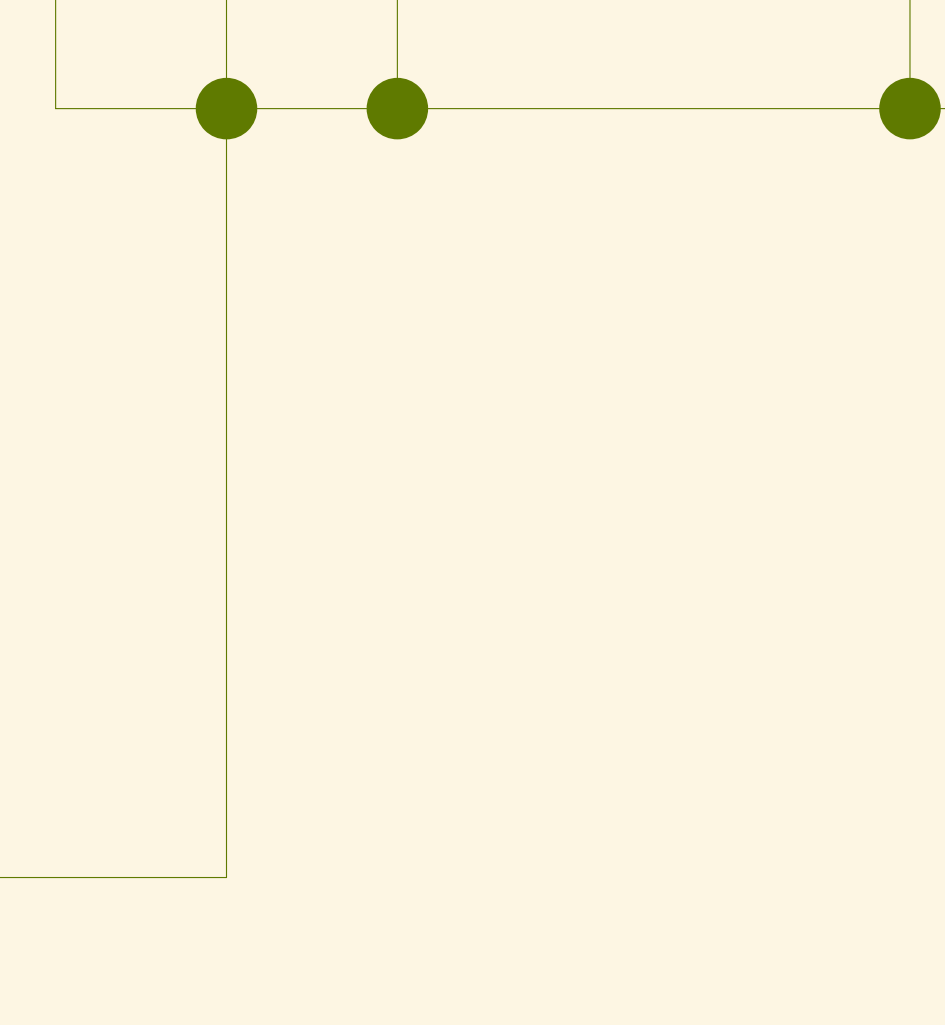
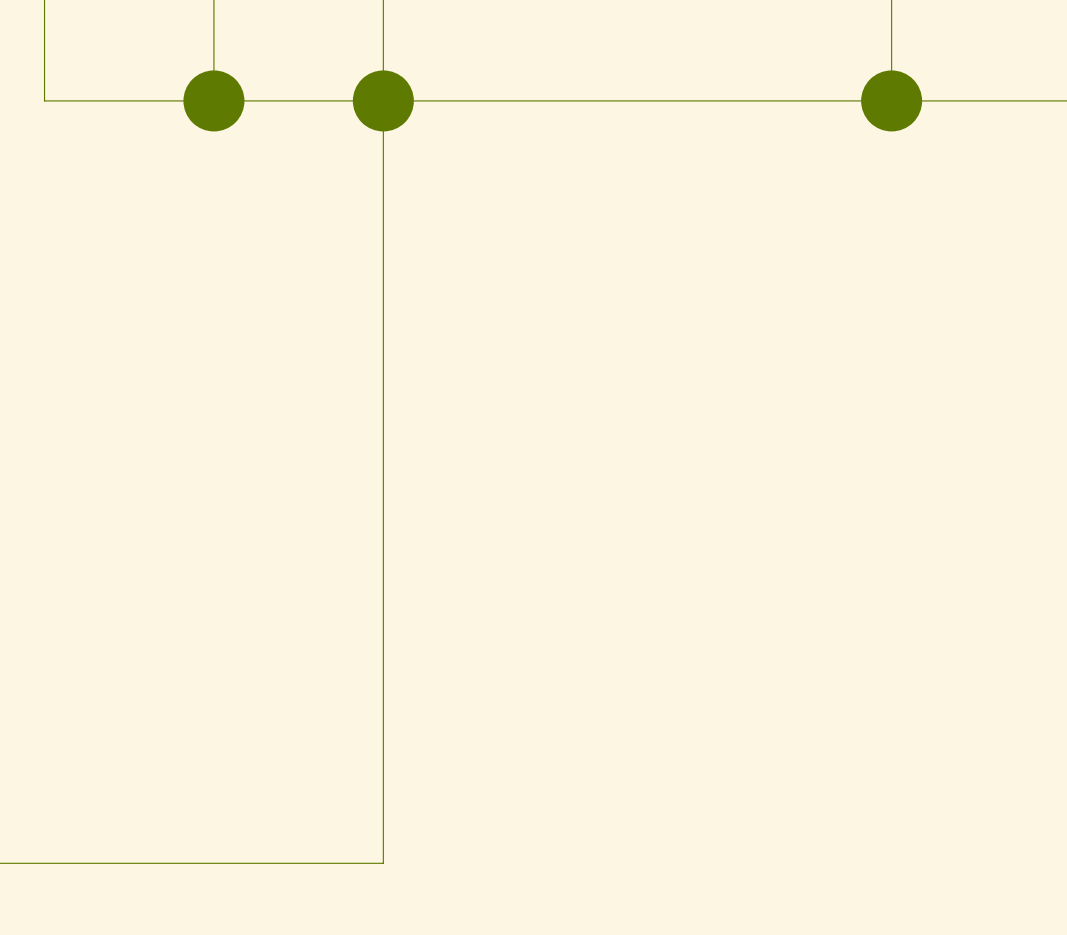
wire: (226, 108) (226, 877) -> (383, 100) (383, 863) (213, 863)

